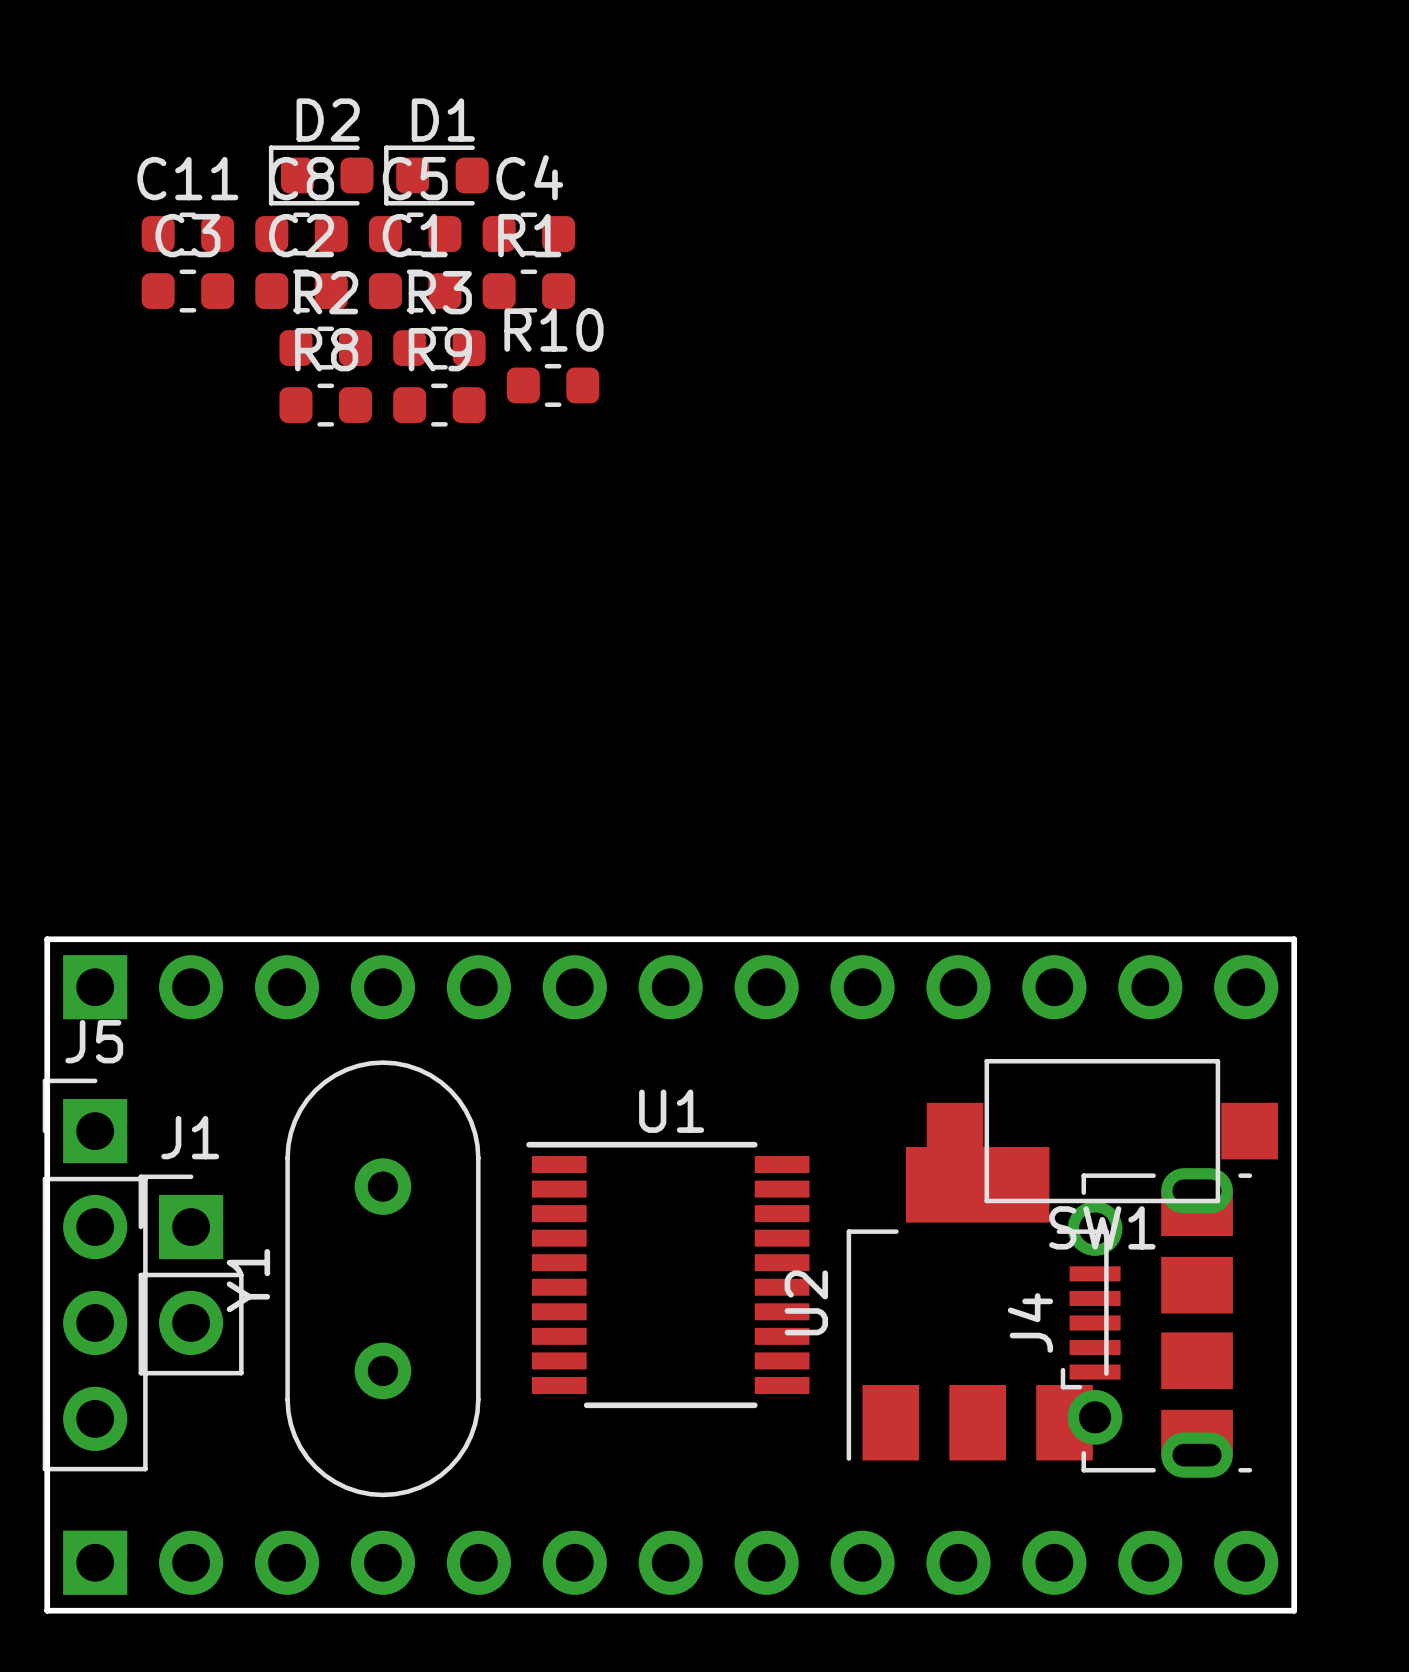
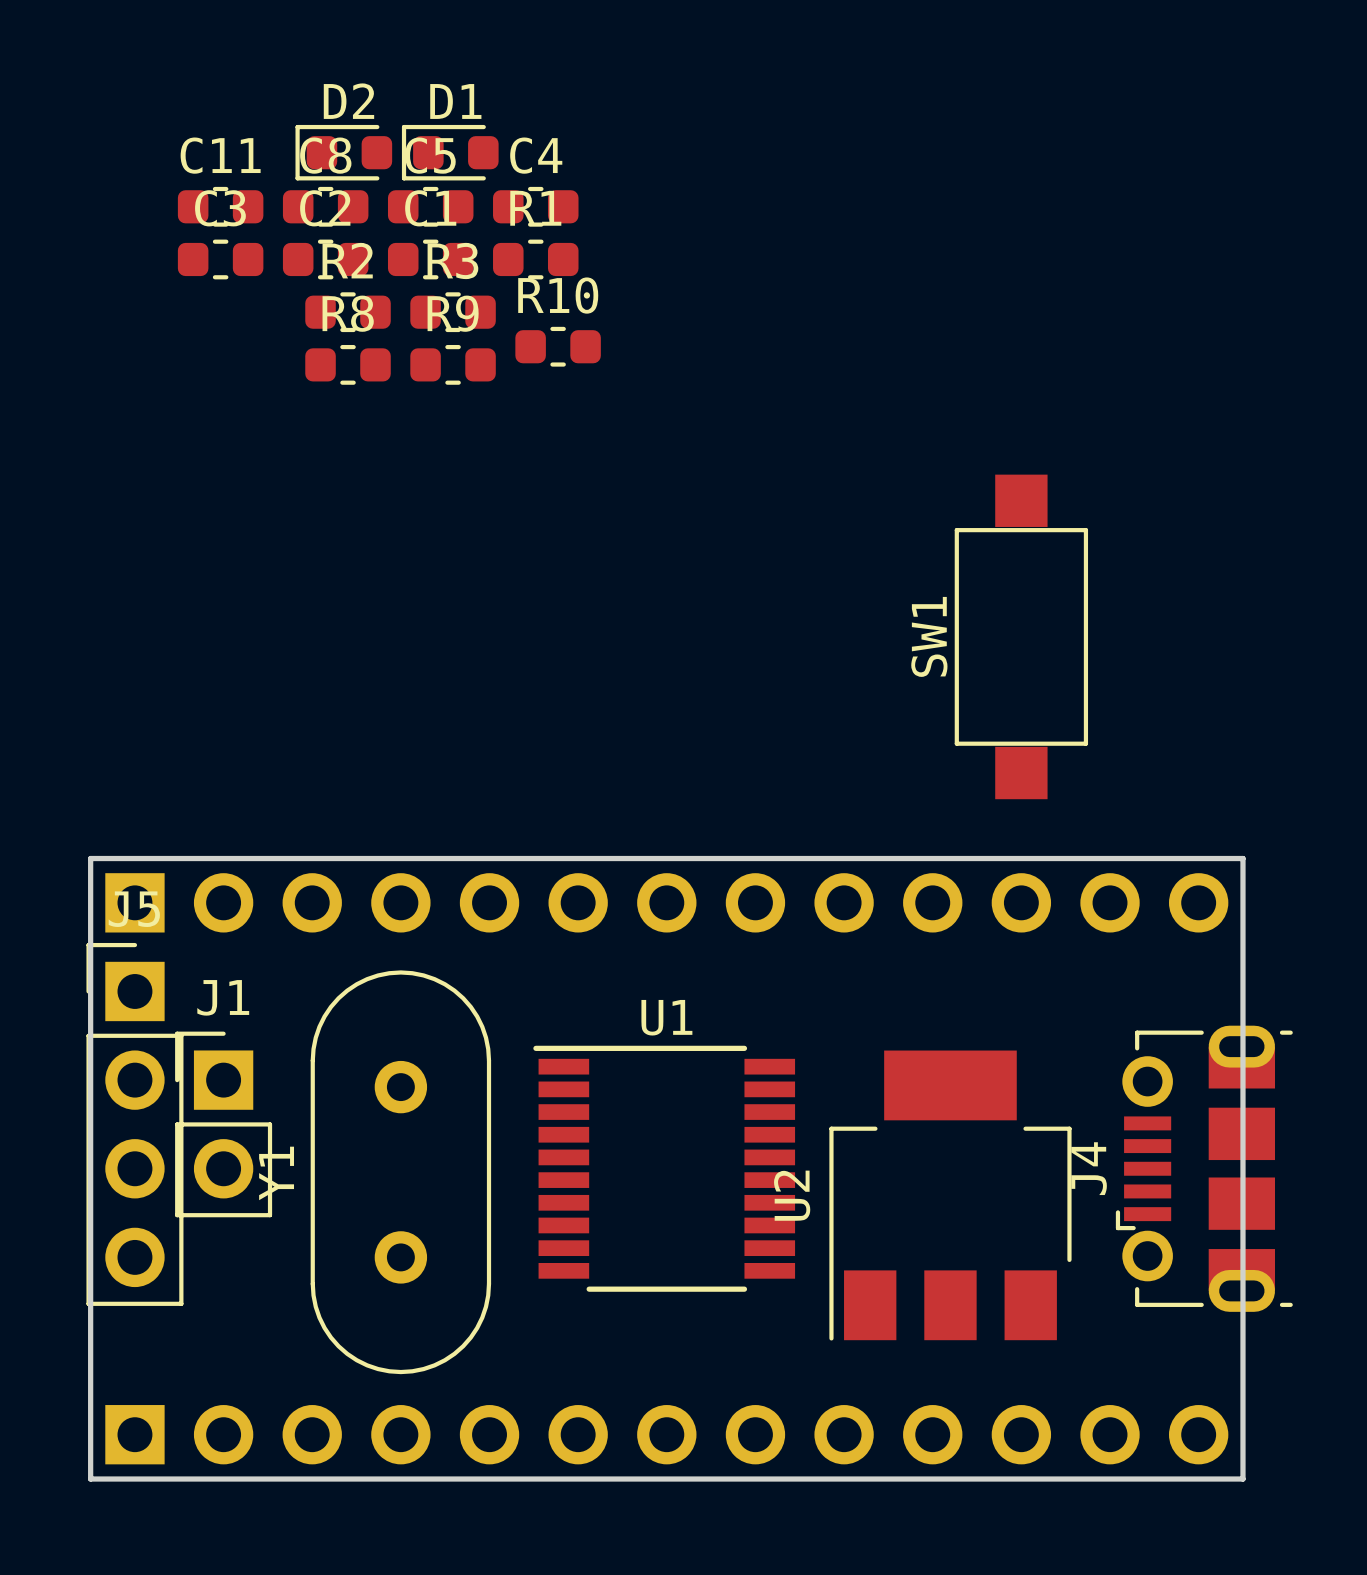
SW1 rotation: 0° (1102, 1131) -> 90° clockwise (1021, 636)
SW1 position: (1102, 1131) -> (1021, 636)
J4 footprint: [1060, 1168, 1253, 1478] -> [1115, 1025, 1293, 1312]
J5 position: (95, 1274) -> (134, 1124)
J1 position: (191, 1274) -> (223, 1124)

